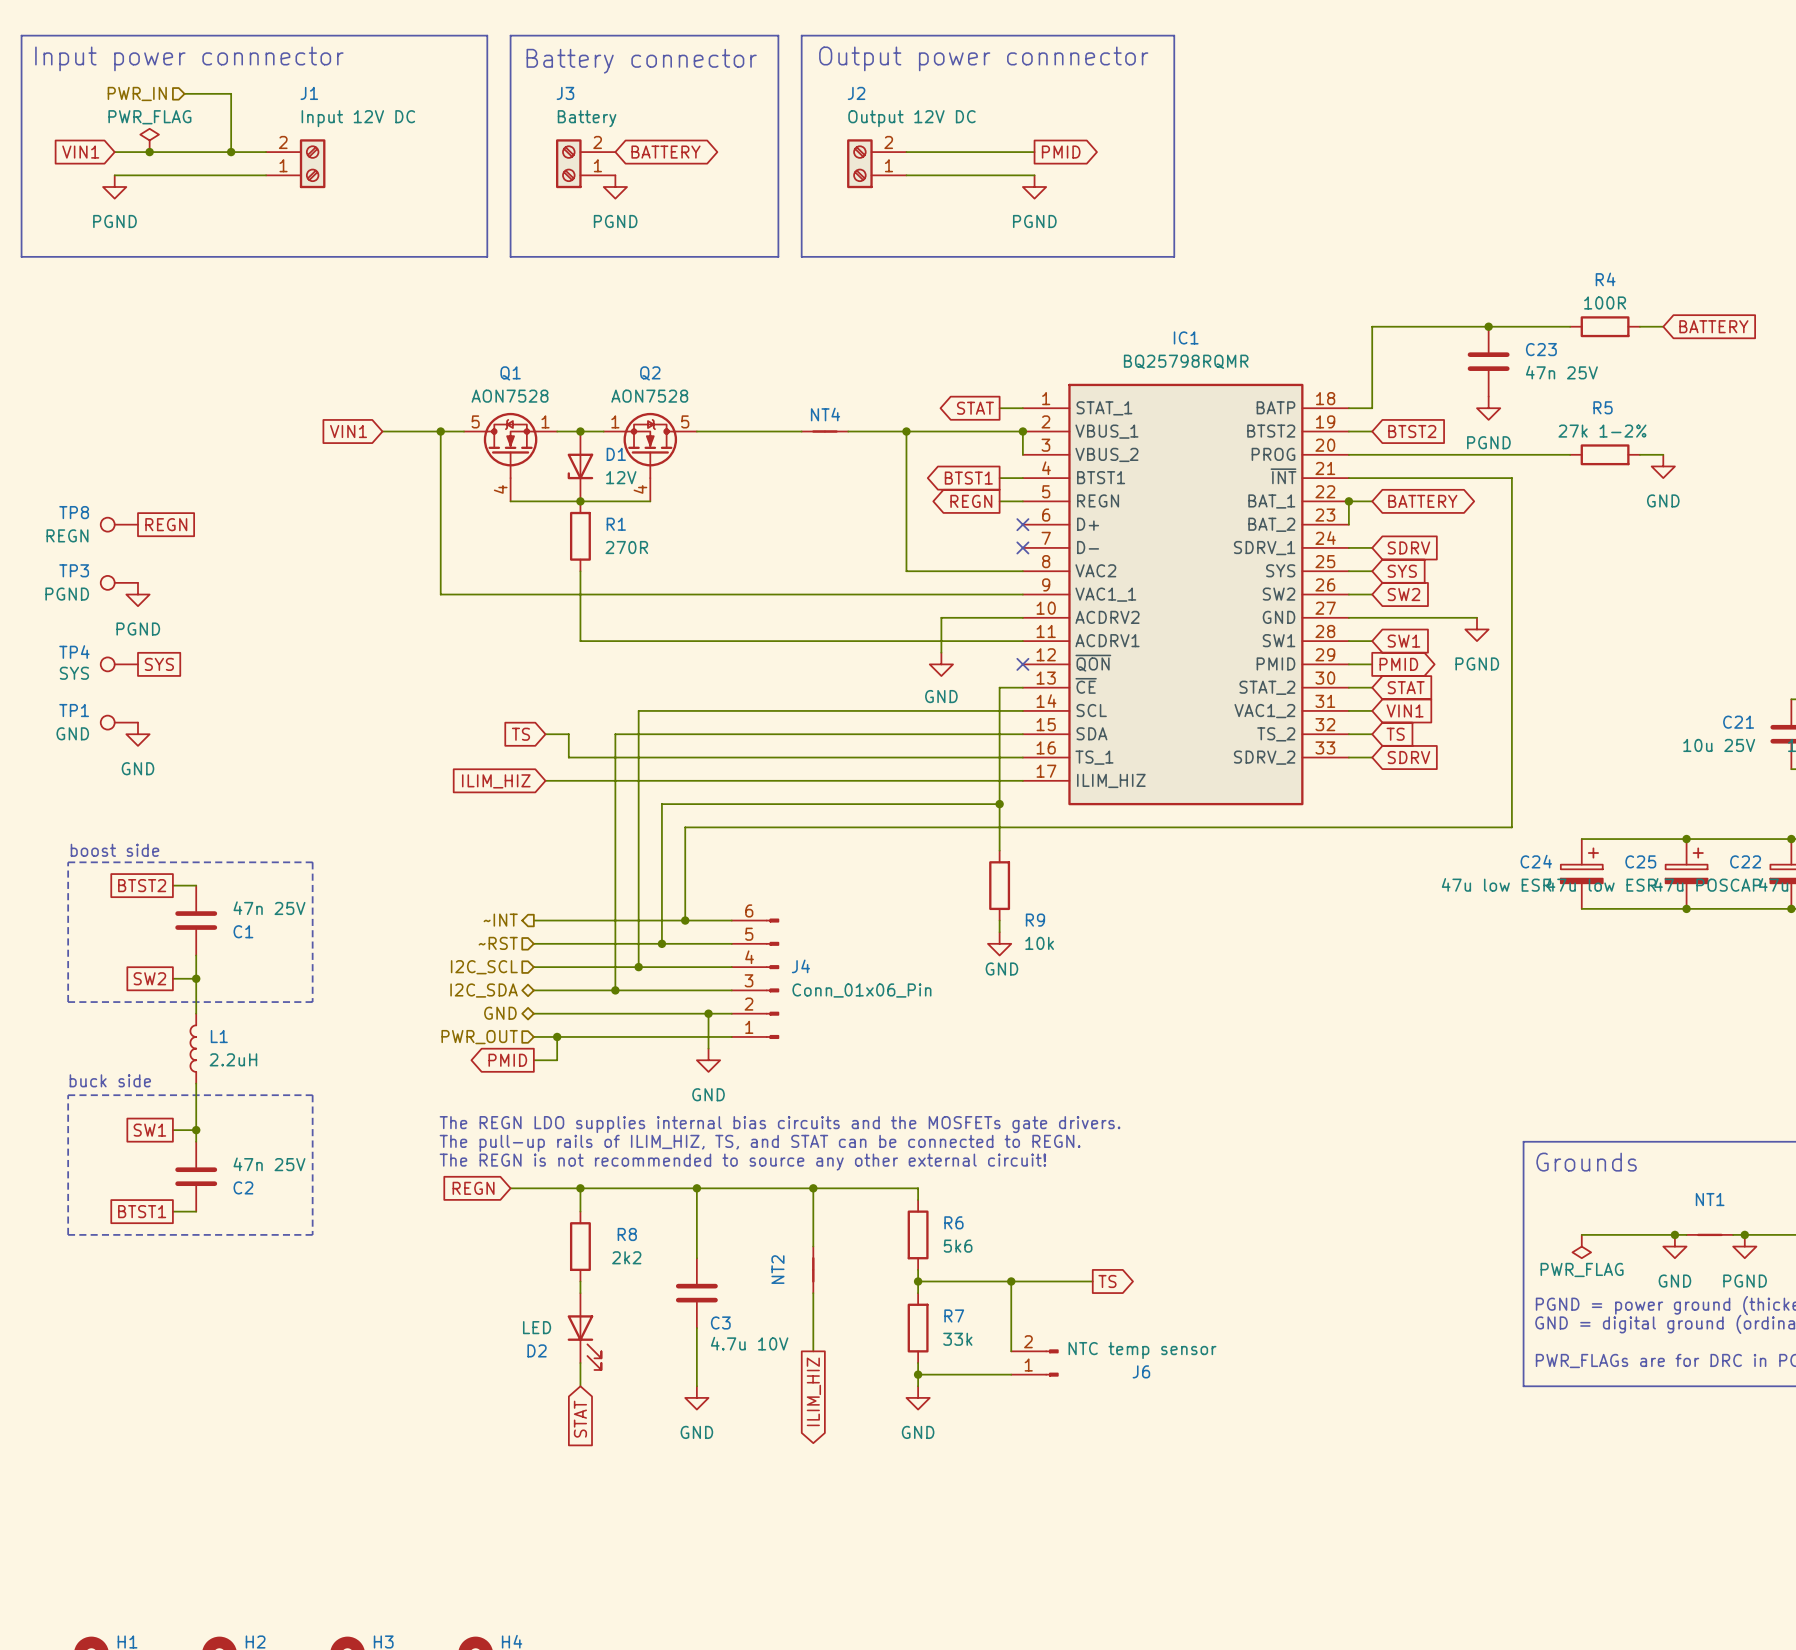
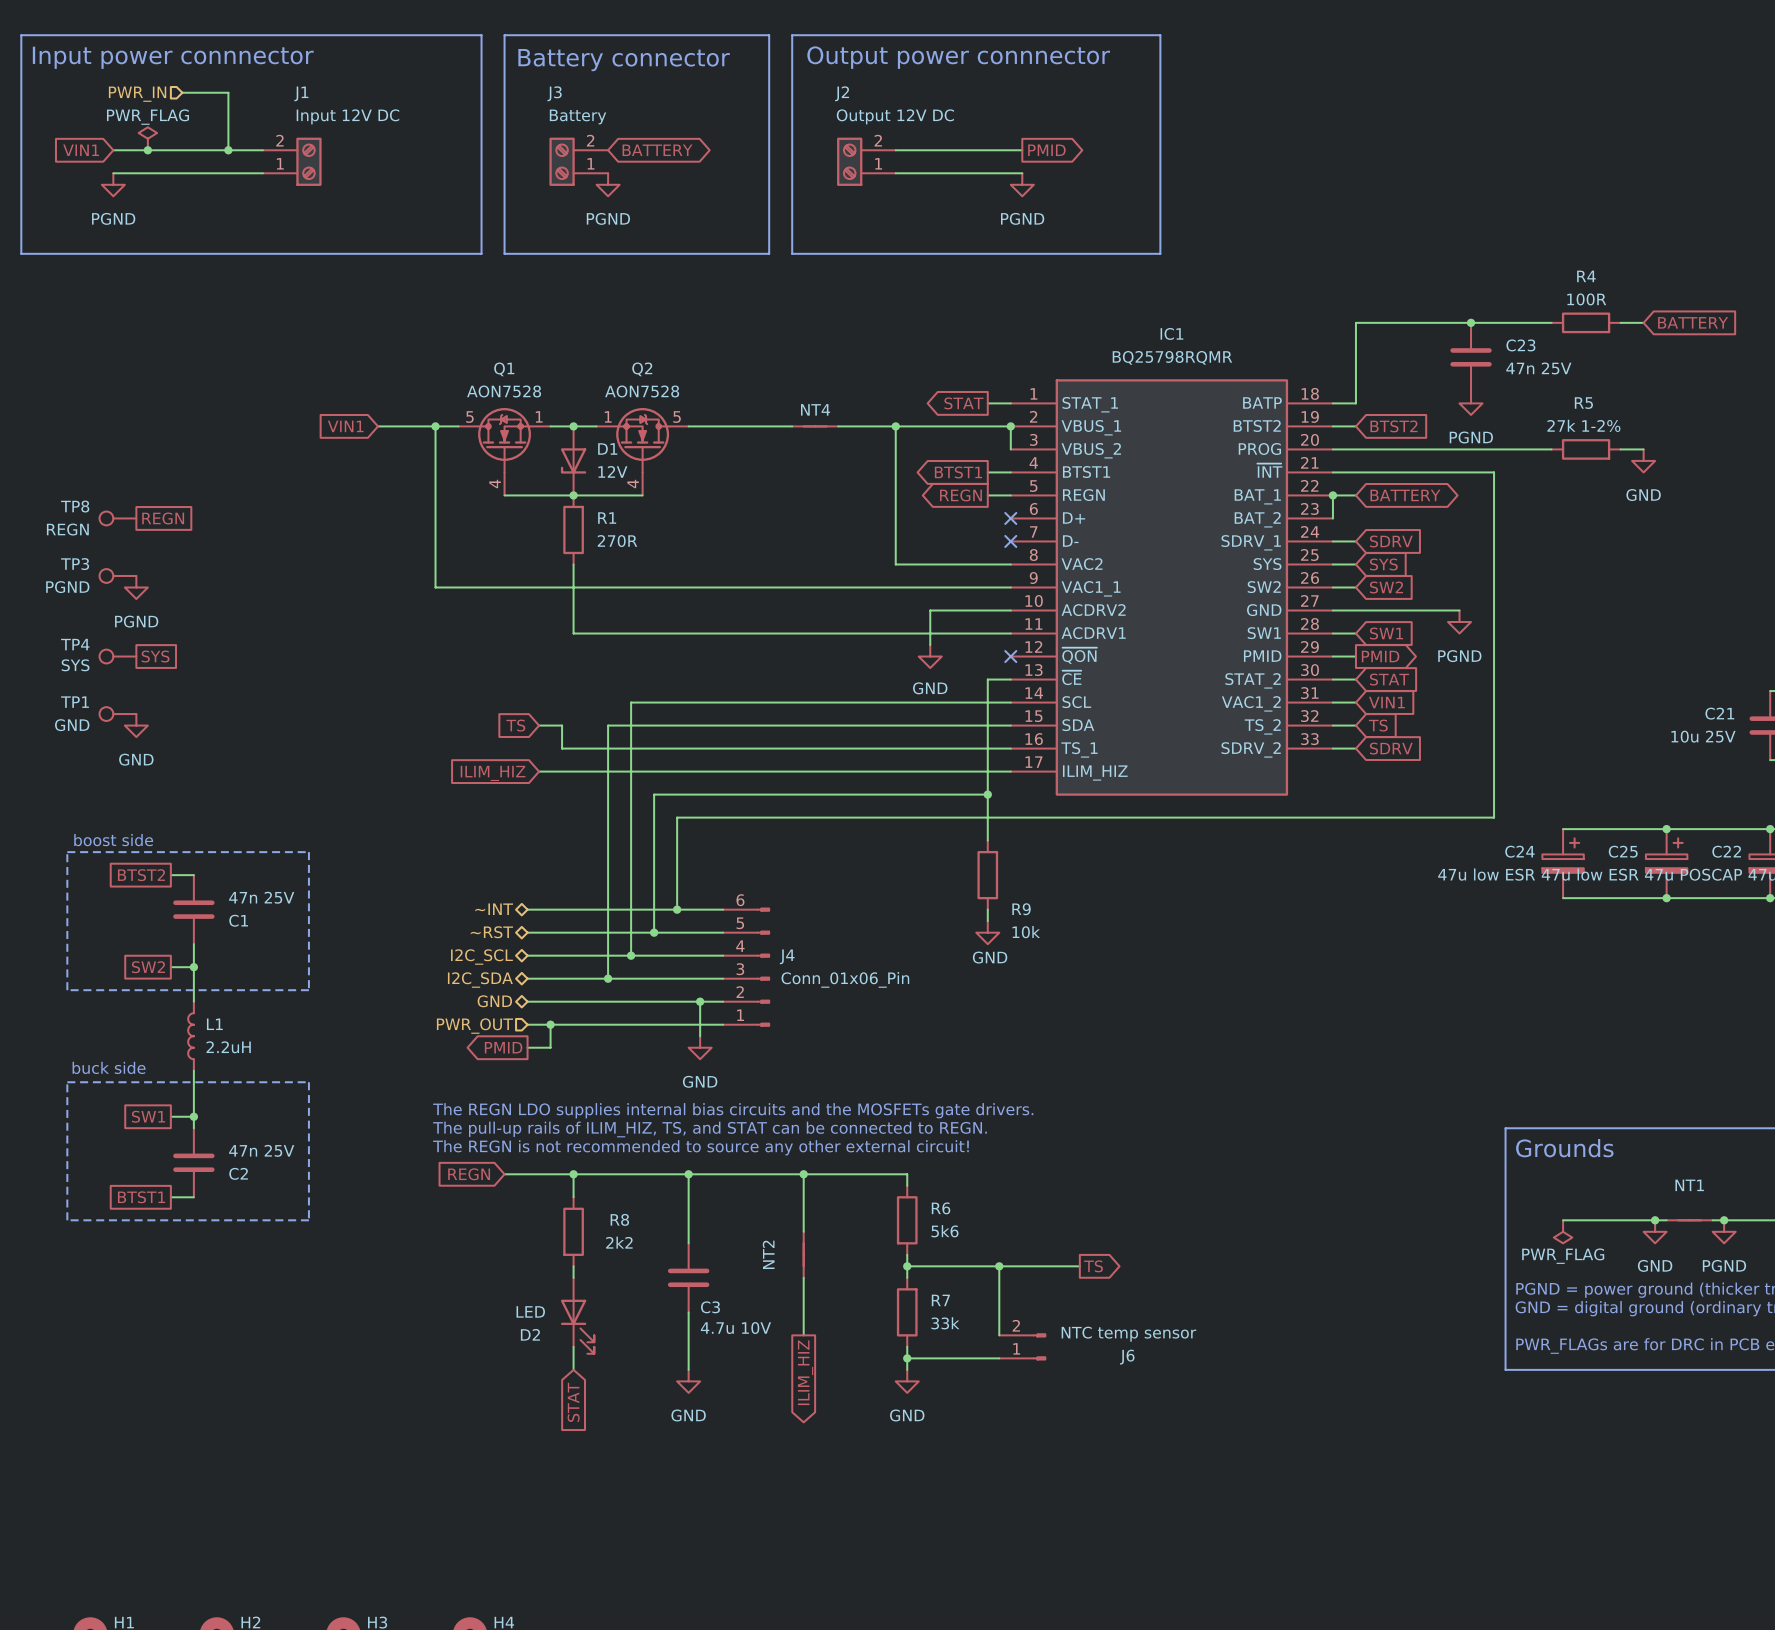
hierarchical label shape: output (500, 920) -> bidirectional (494, 909)
hierarchical label shape: input (498, 943) -> bidirectional (491, 932)
hierarchical label shape: input (484, 967) -> bidirectional (481, 957)

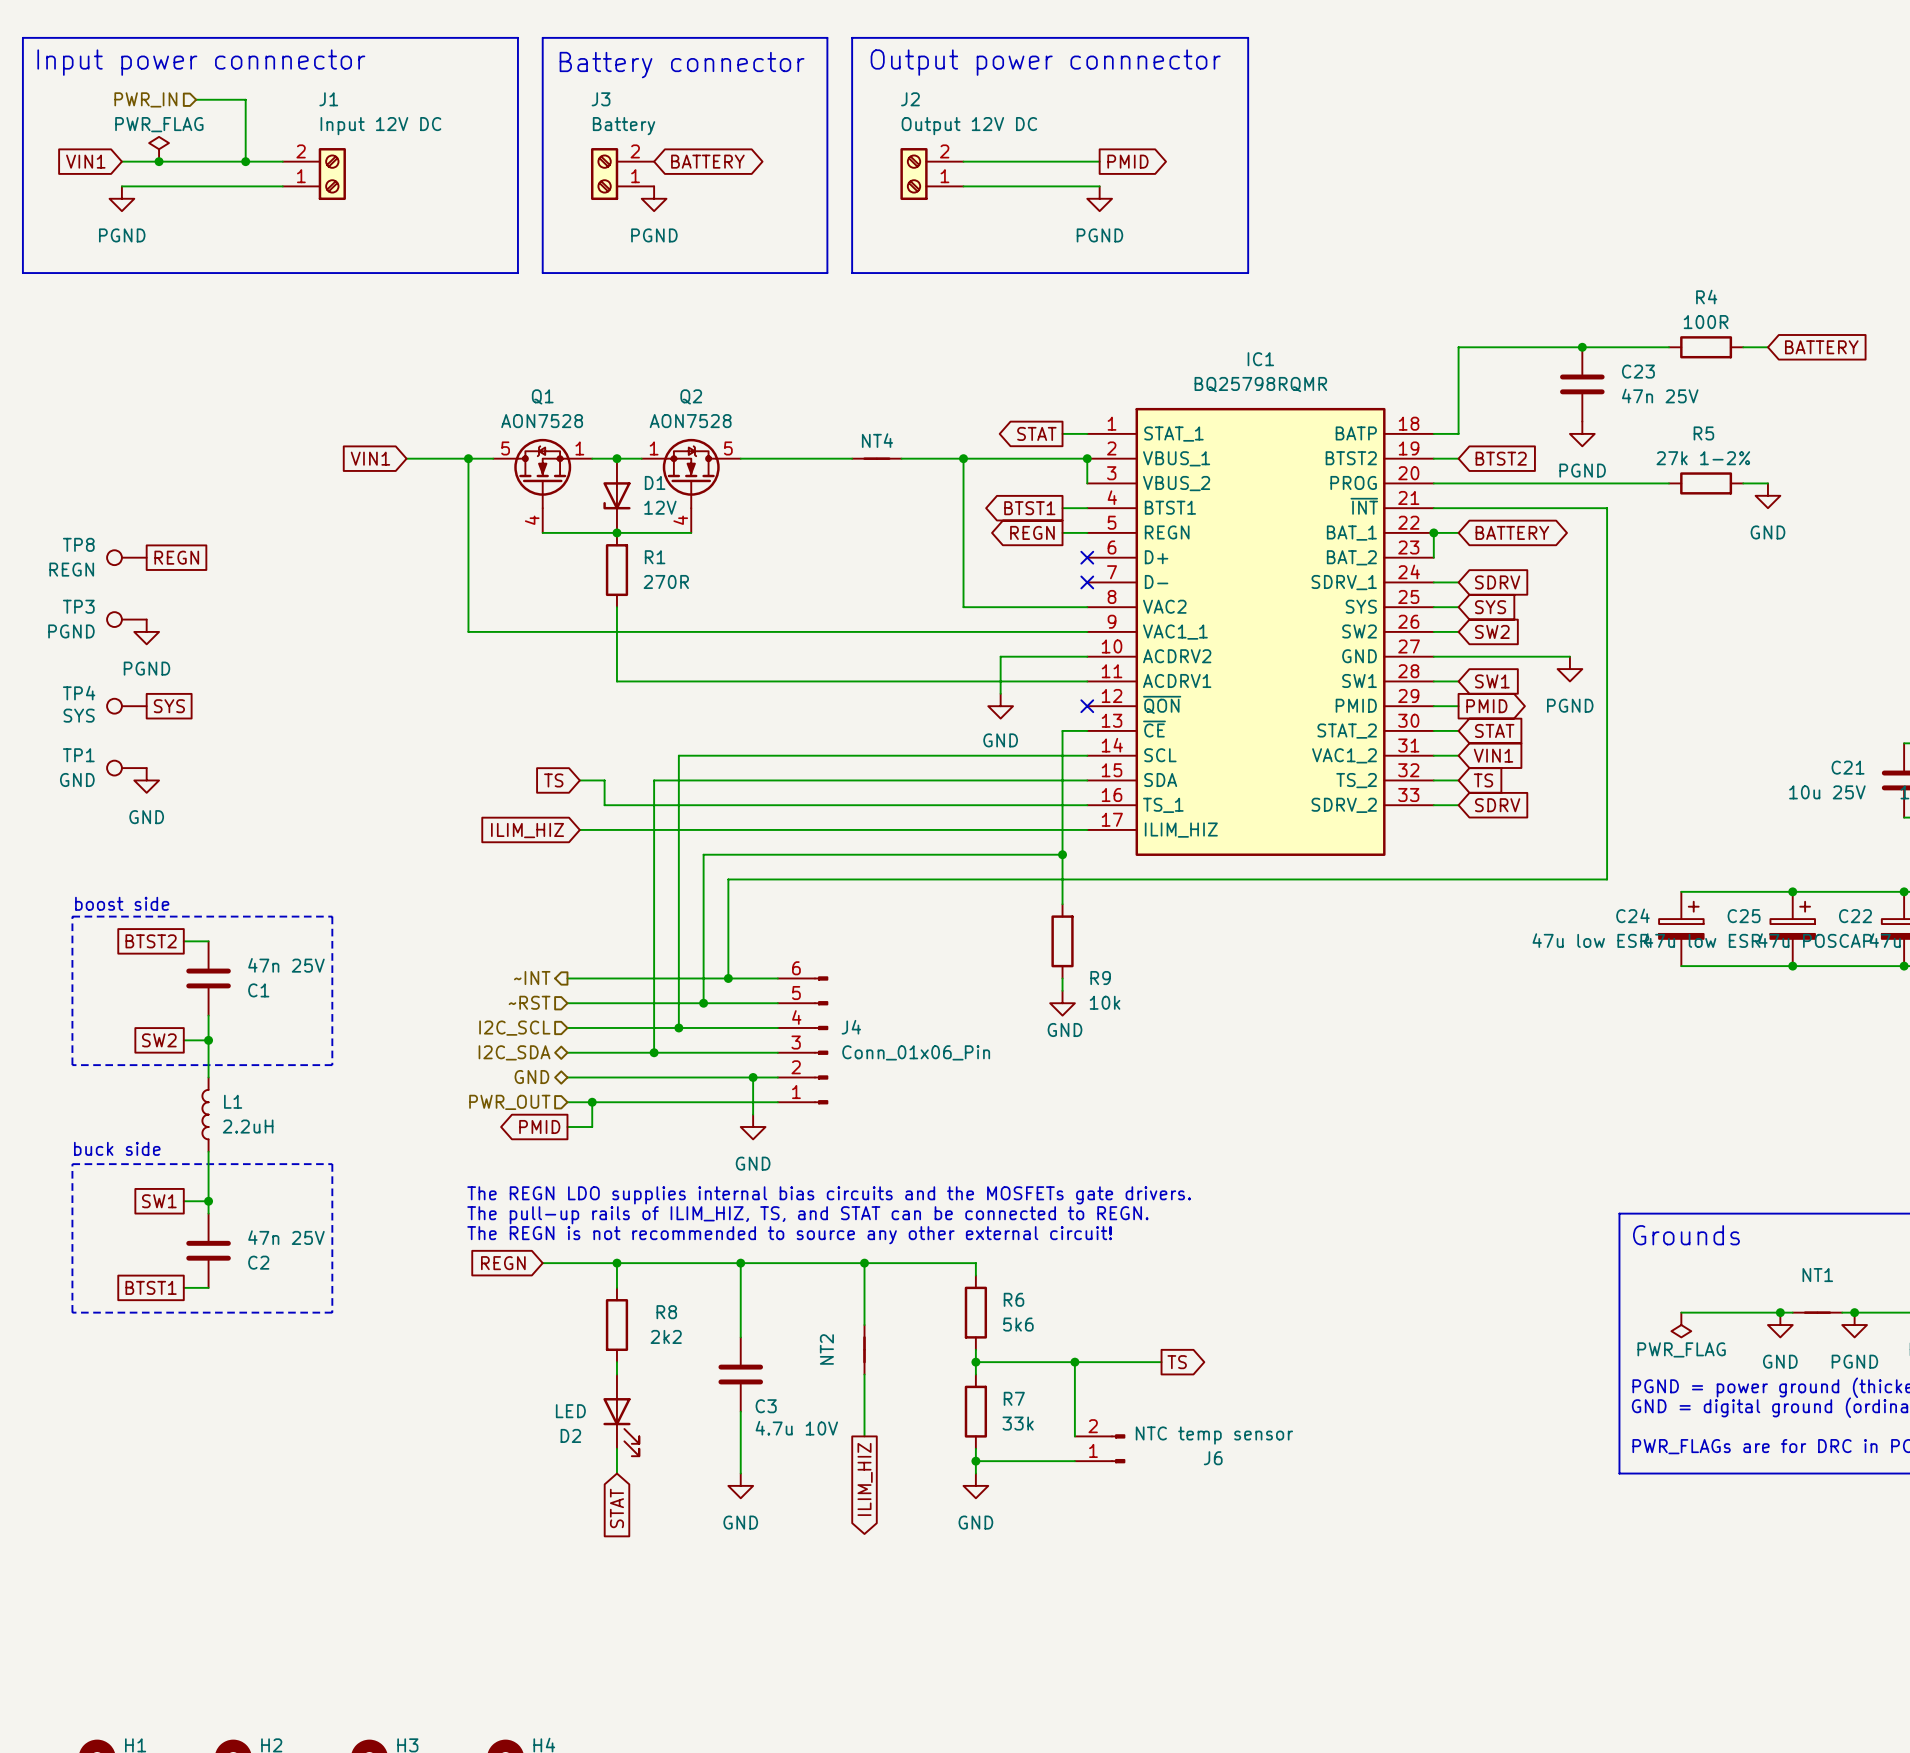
hierarchical label shape: bidirectional (494, 909) -> output (532, 978)
hierarchical label shape: bidirectional (491, 932) -> input (529, 1002)
hierarchical label shape: bidirectional (481, 957) -> input (514, 1028)

